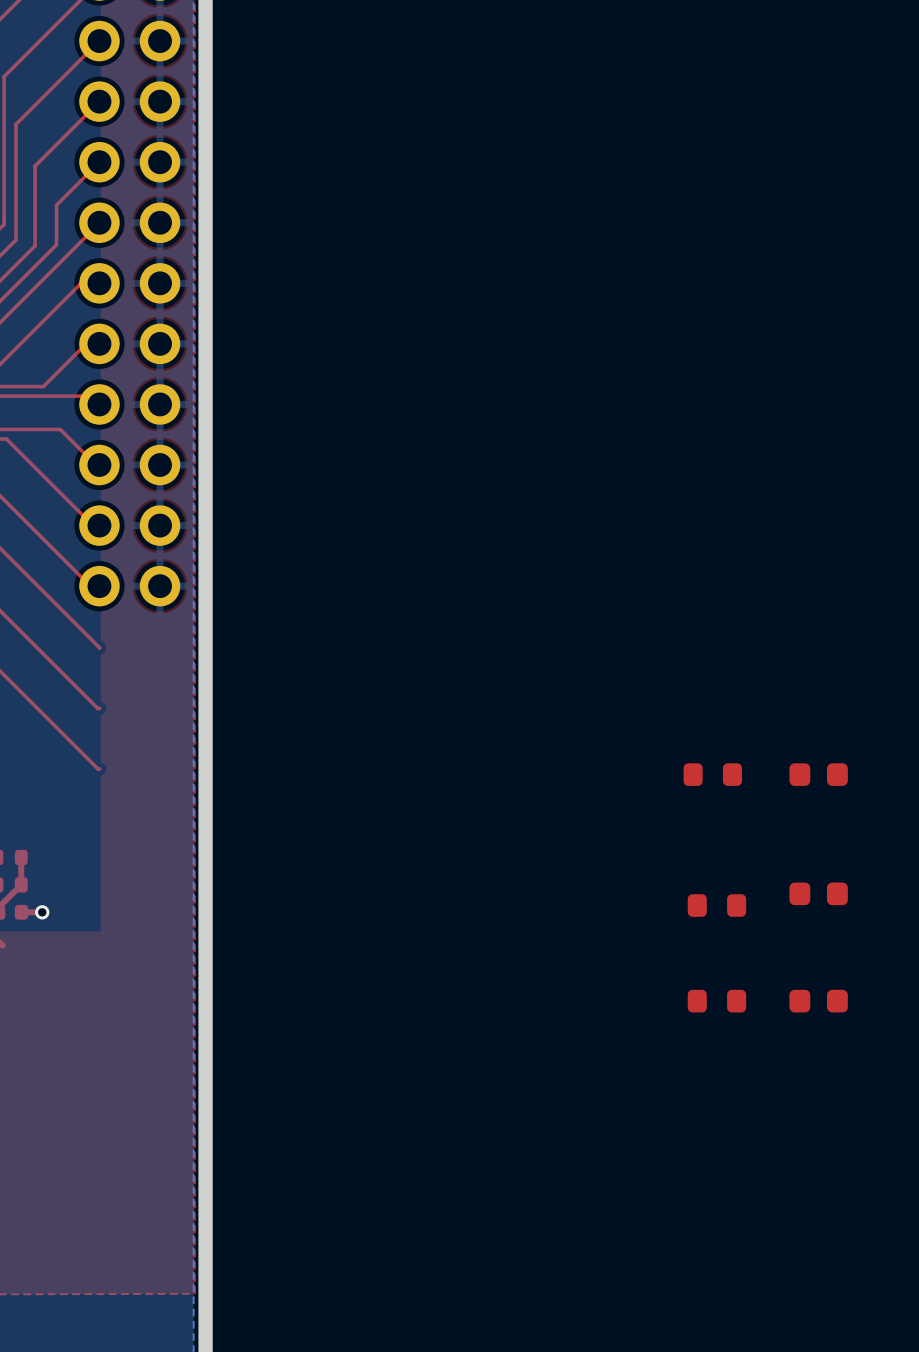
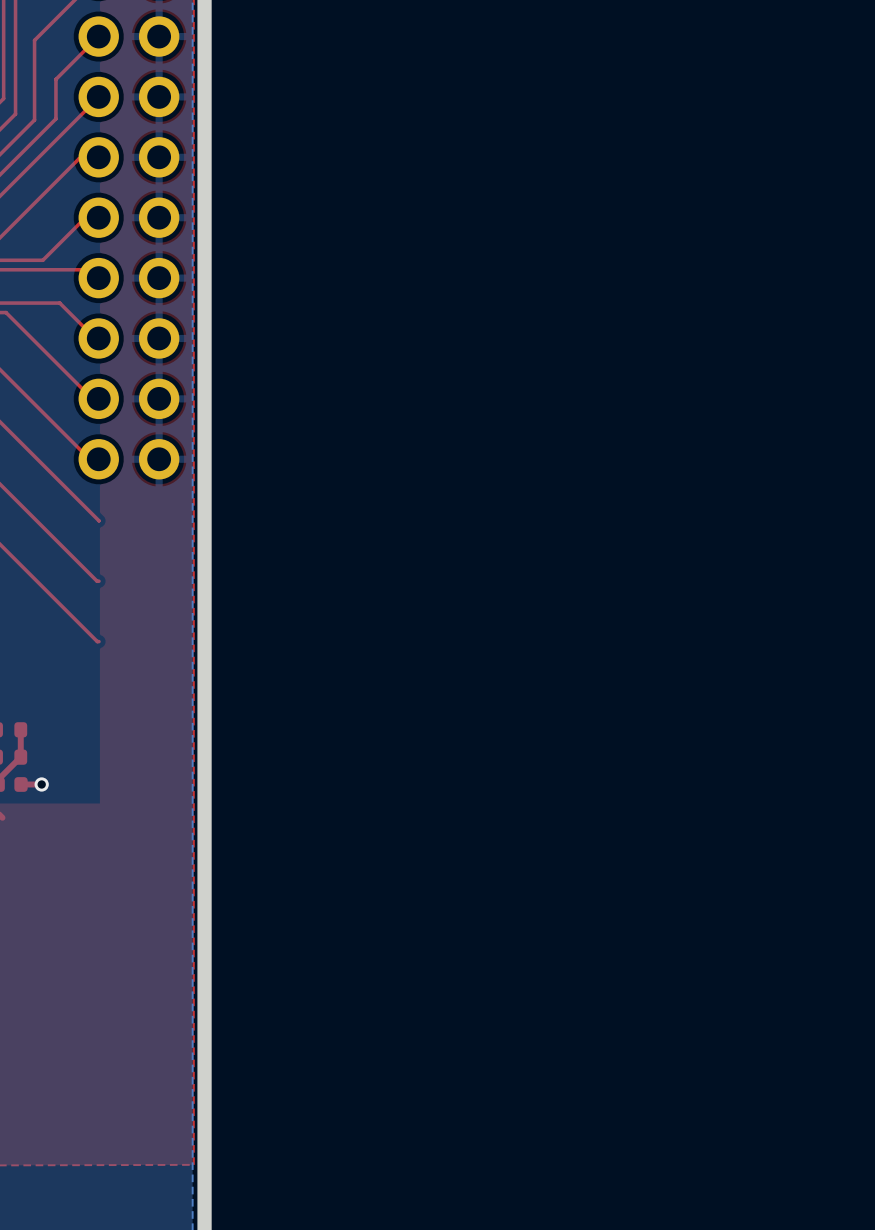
part: (712, 774) -> none
part: (818, 774) -> none
part: (818, 893) -> none
part: (716, 905) -> none
part: (716, 1001) -> none
part: (818, 1001) -> none

